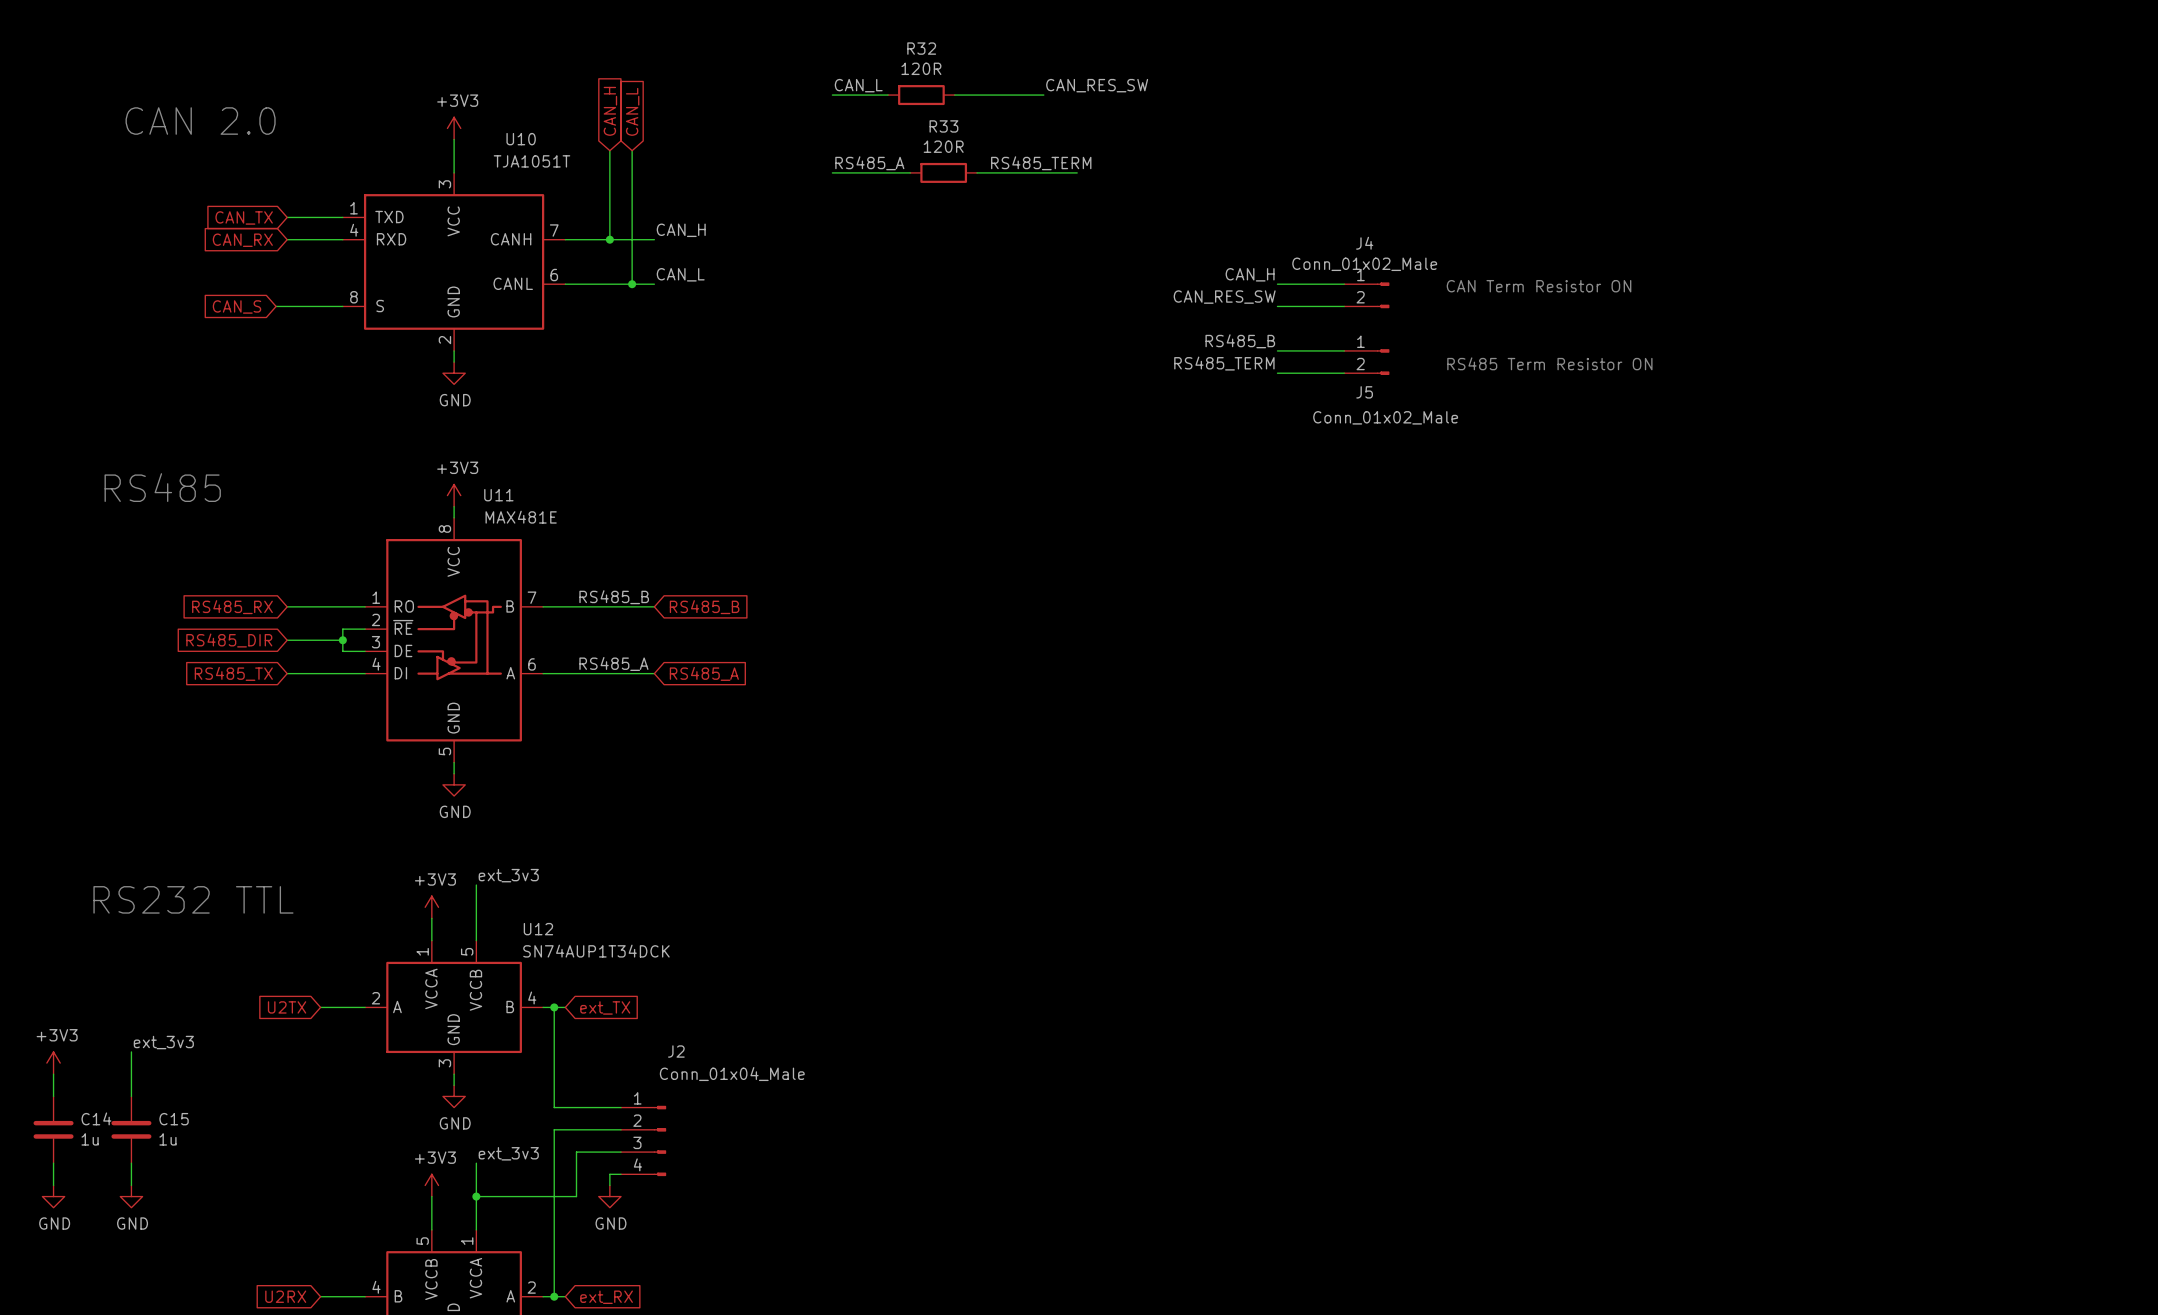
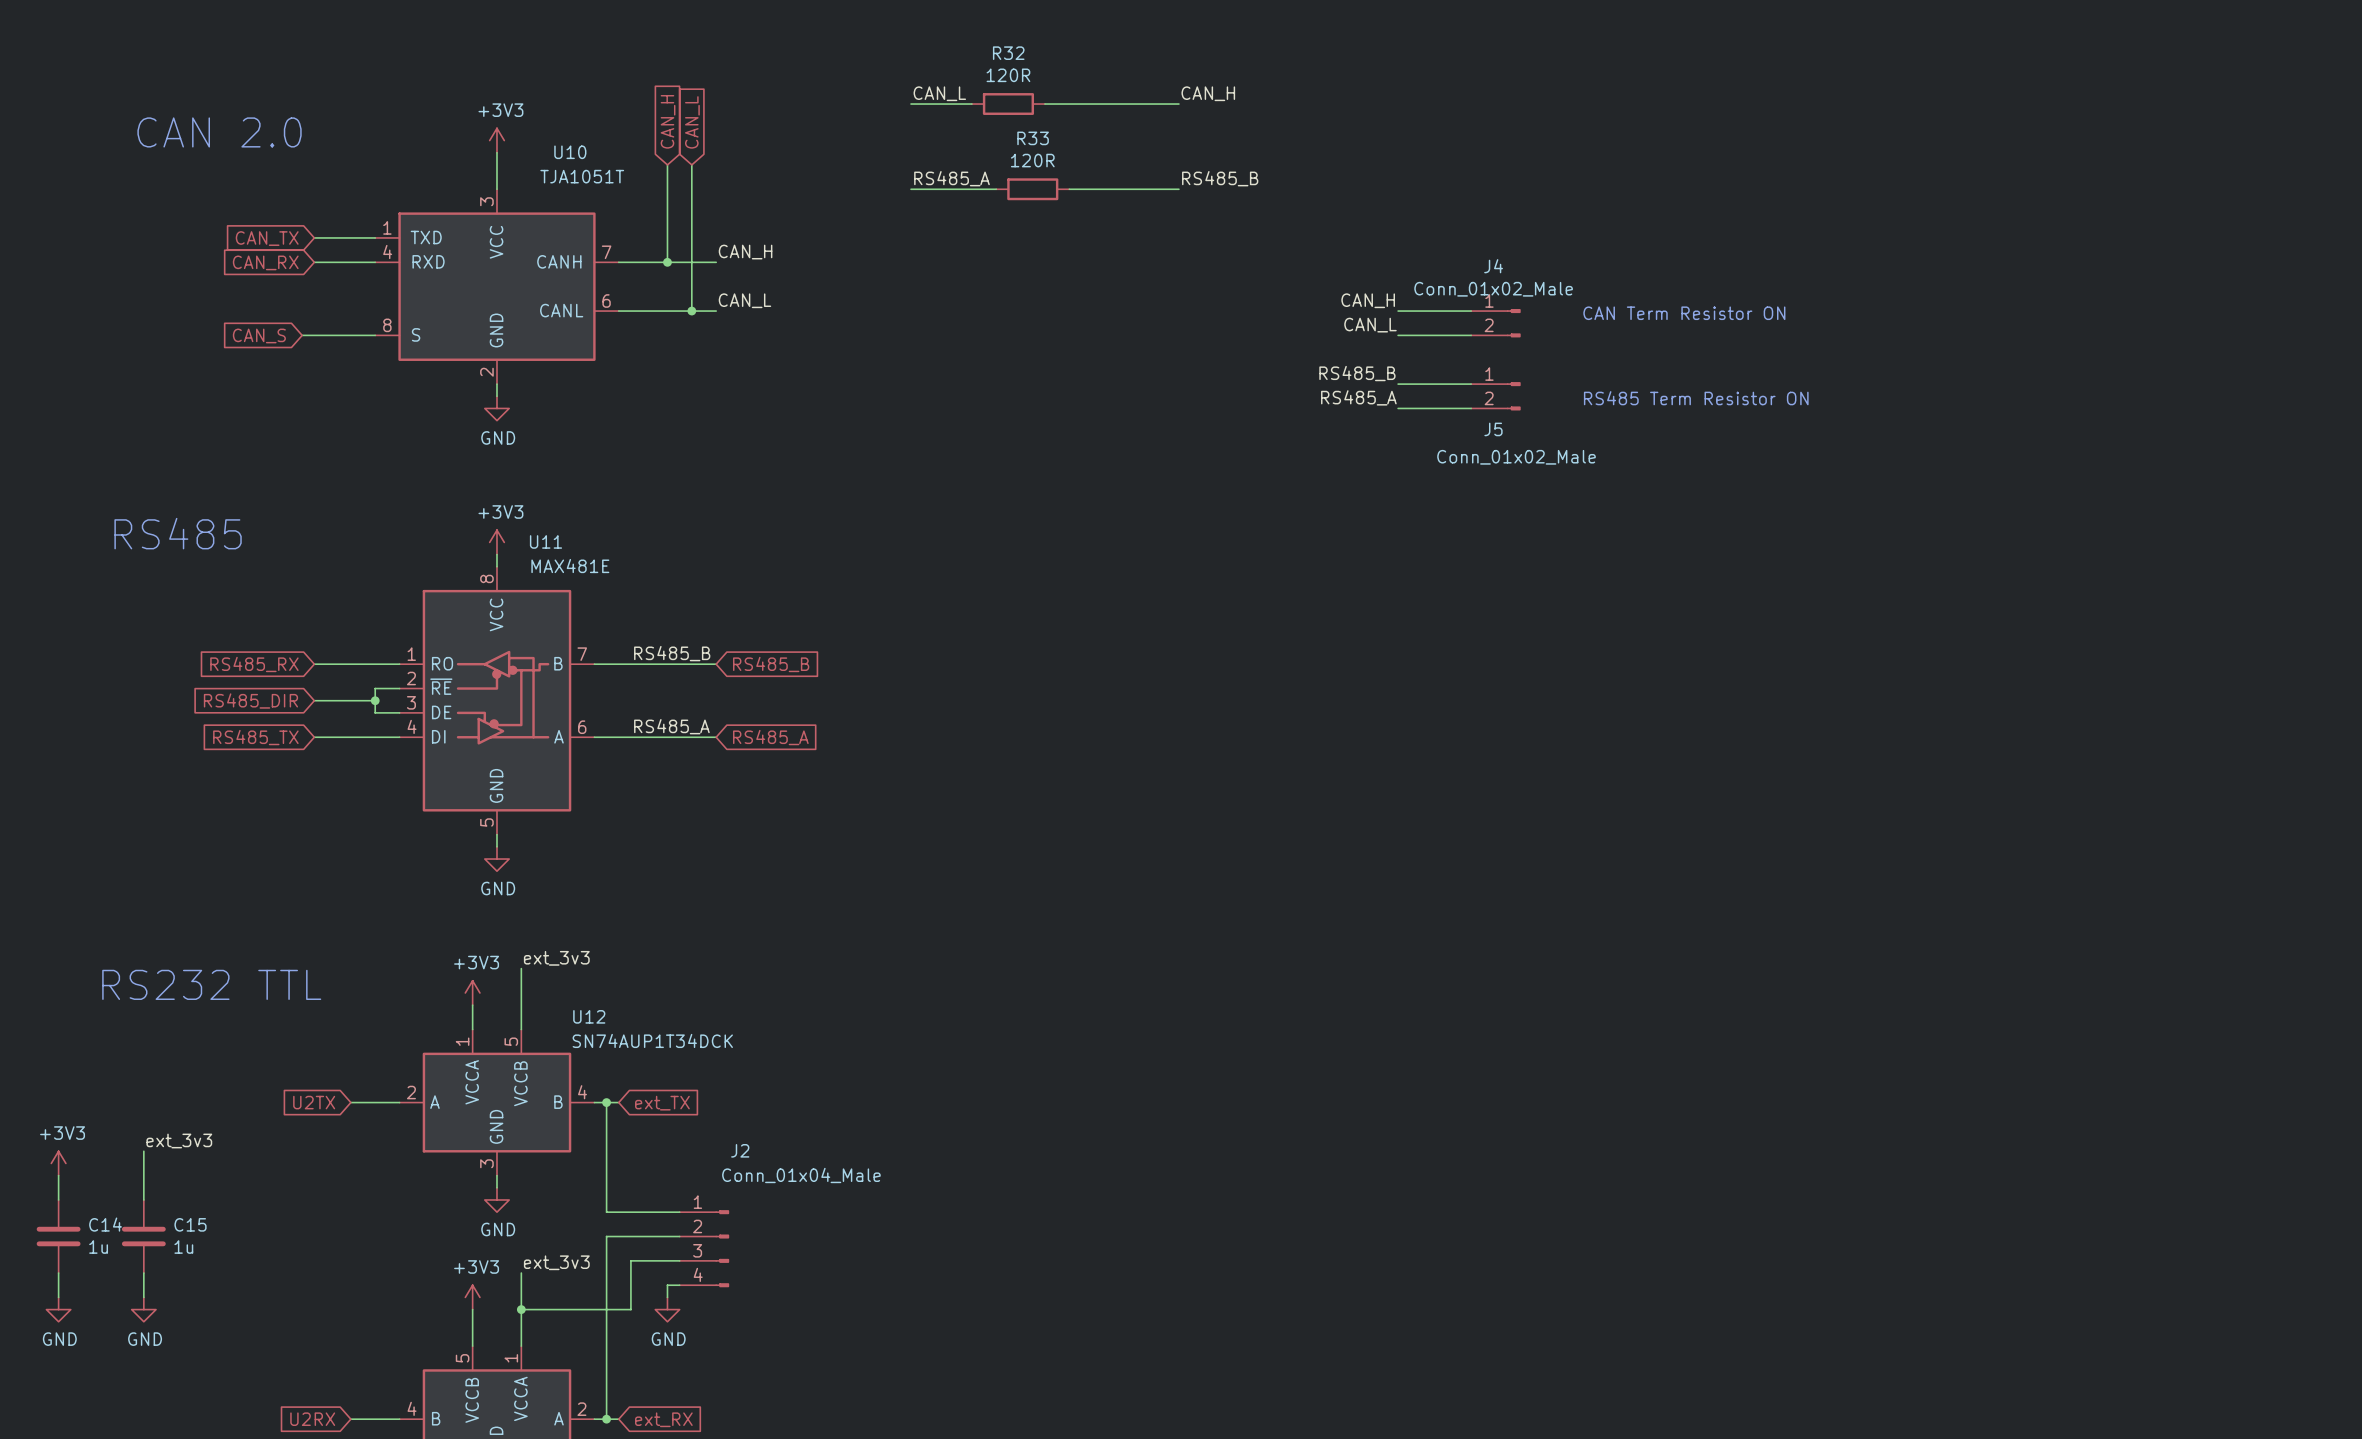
label: CAN_RES_SW (1097, 85) -> none
label: none -> CAN_H (1208, 93)
wire: none -> (1142, 104) (1178, 104)
label: RS485_TERM (1041, 163) -> RS485_B (1220, 178)
label: CAN_RES_SW (1224, 297) -> CAN_L (1370, 325)
label: RS485_TERM (1224, 363) -> RS485_A (1358, 397)

